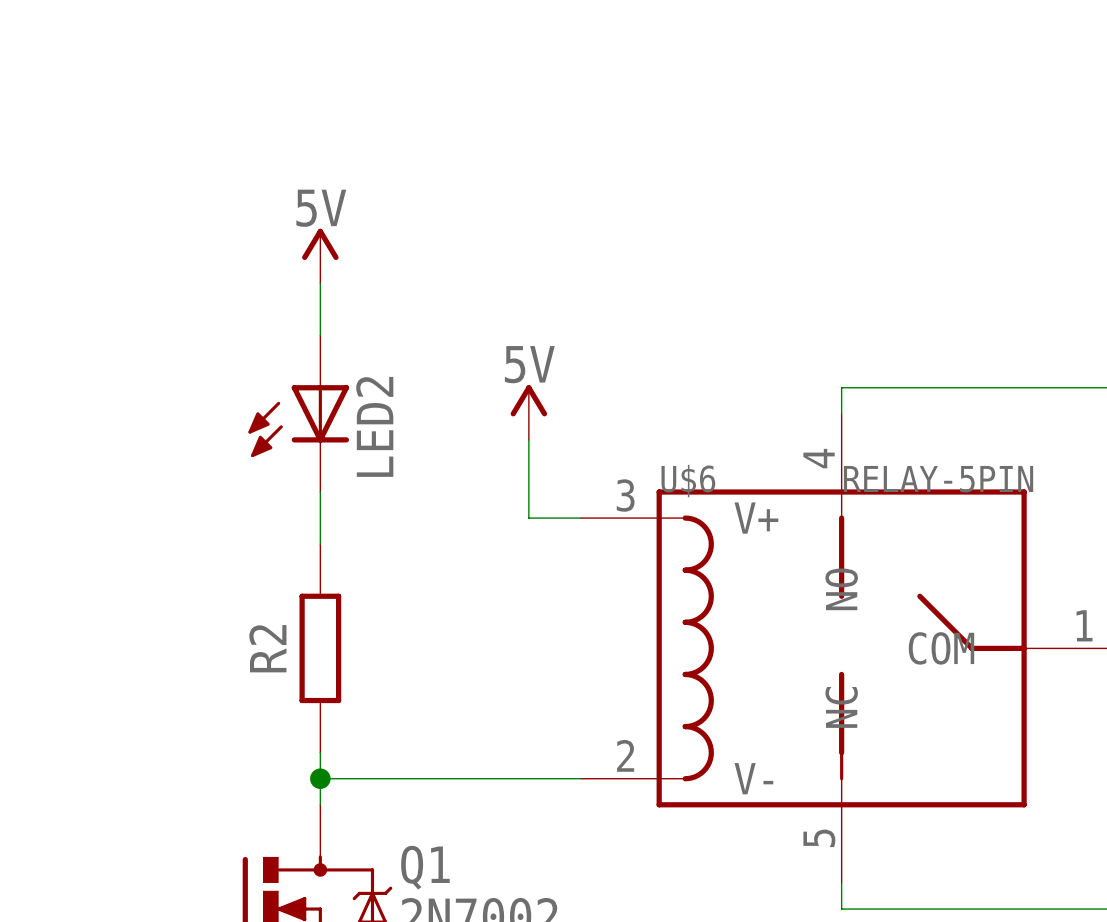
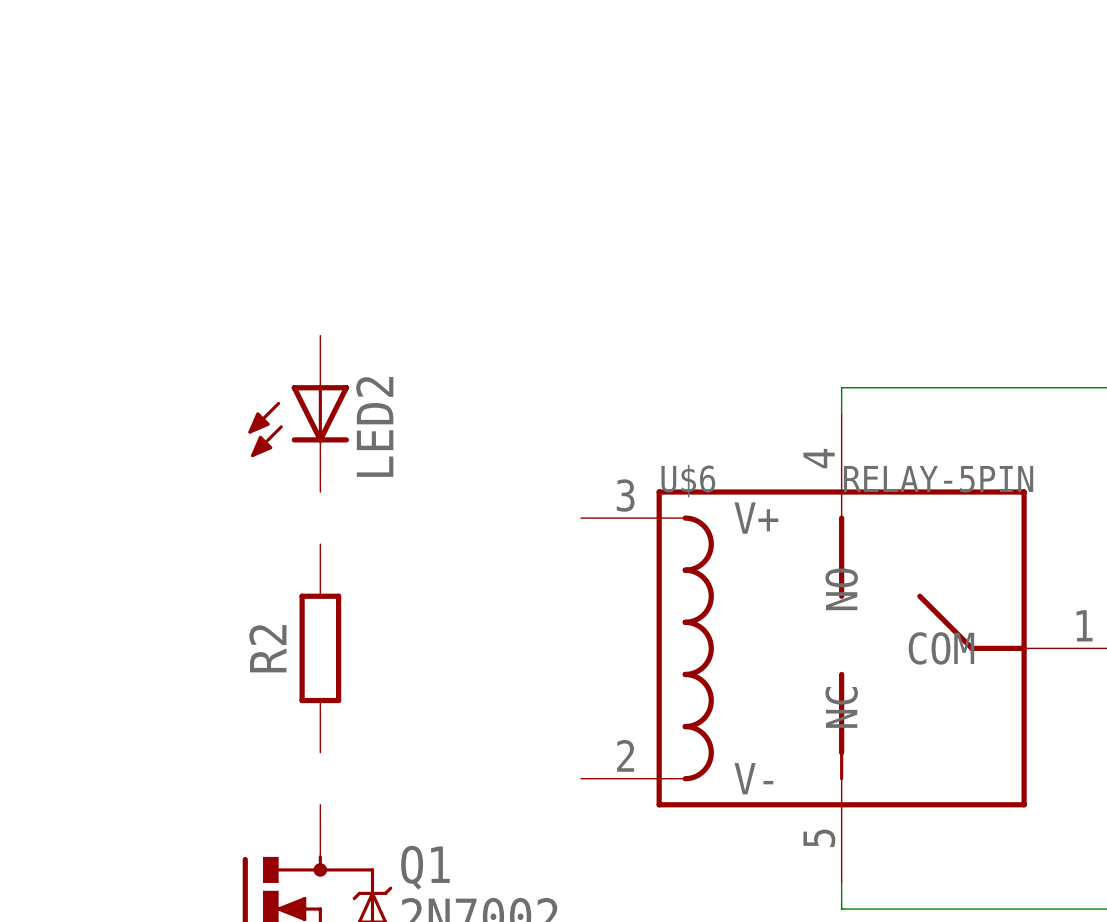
power symbol: 5V (320, 256) -> none
wire: (320, 283) (320, 335) -> none
power symbol: 5V (528, 412) -> none
wire: (528, 439) (528, 518) (581, 518) -> none
wire: (320, 492) (320, 544) -> none
wire: (320, 752) (320, 804) -> none
wire: (320, 778) (581, 778) -> none
junction: (320, 778) -> none

